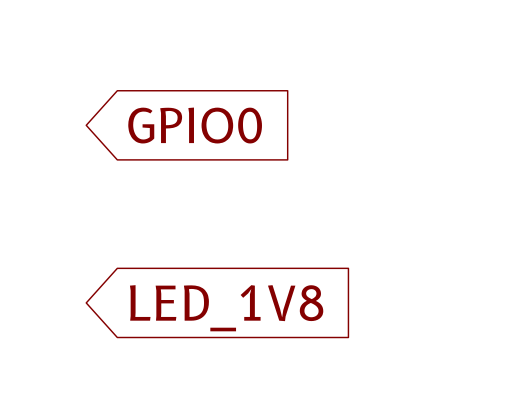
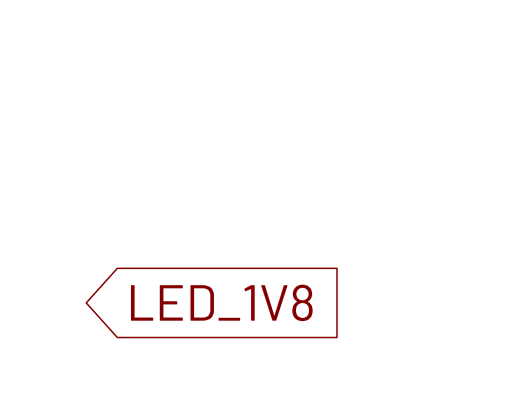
global label: GPIO0 (195, 125) -> none

